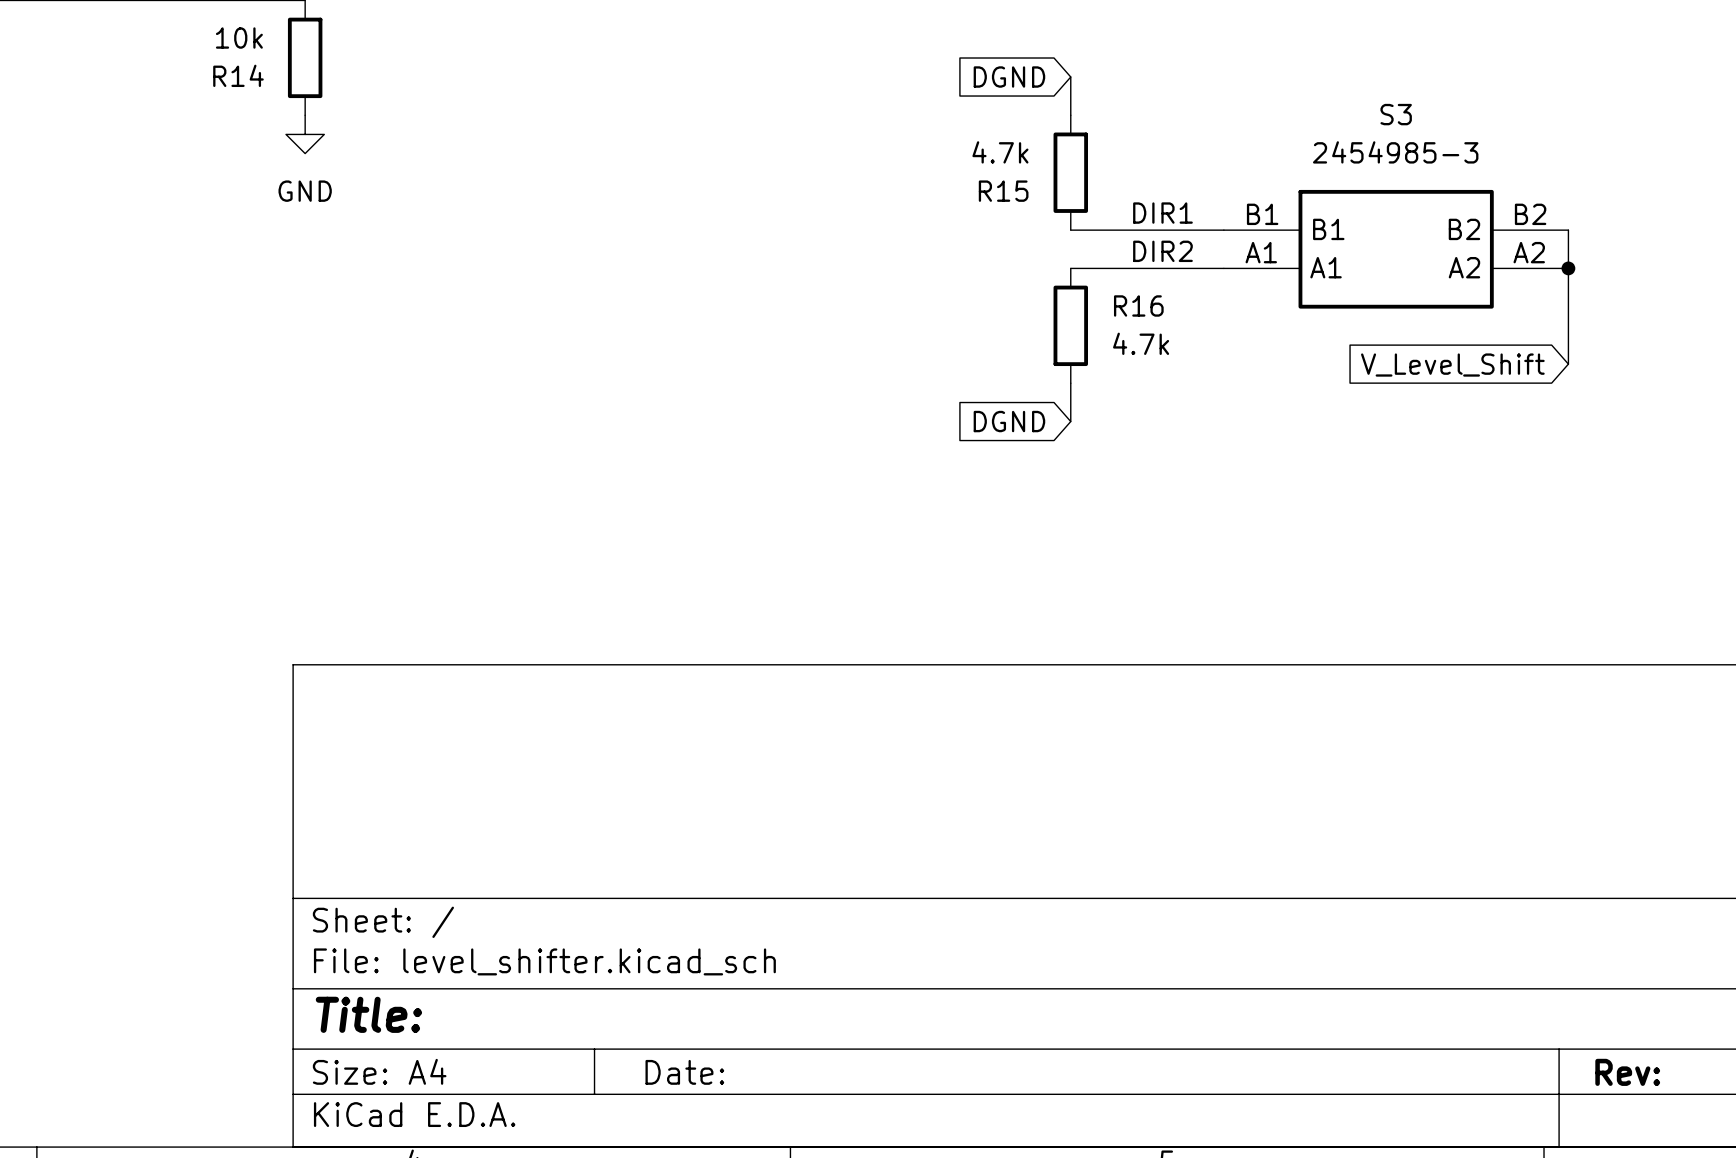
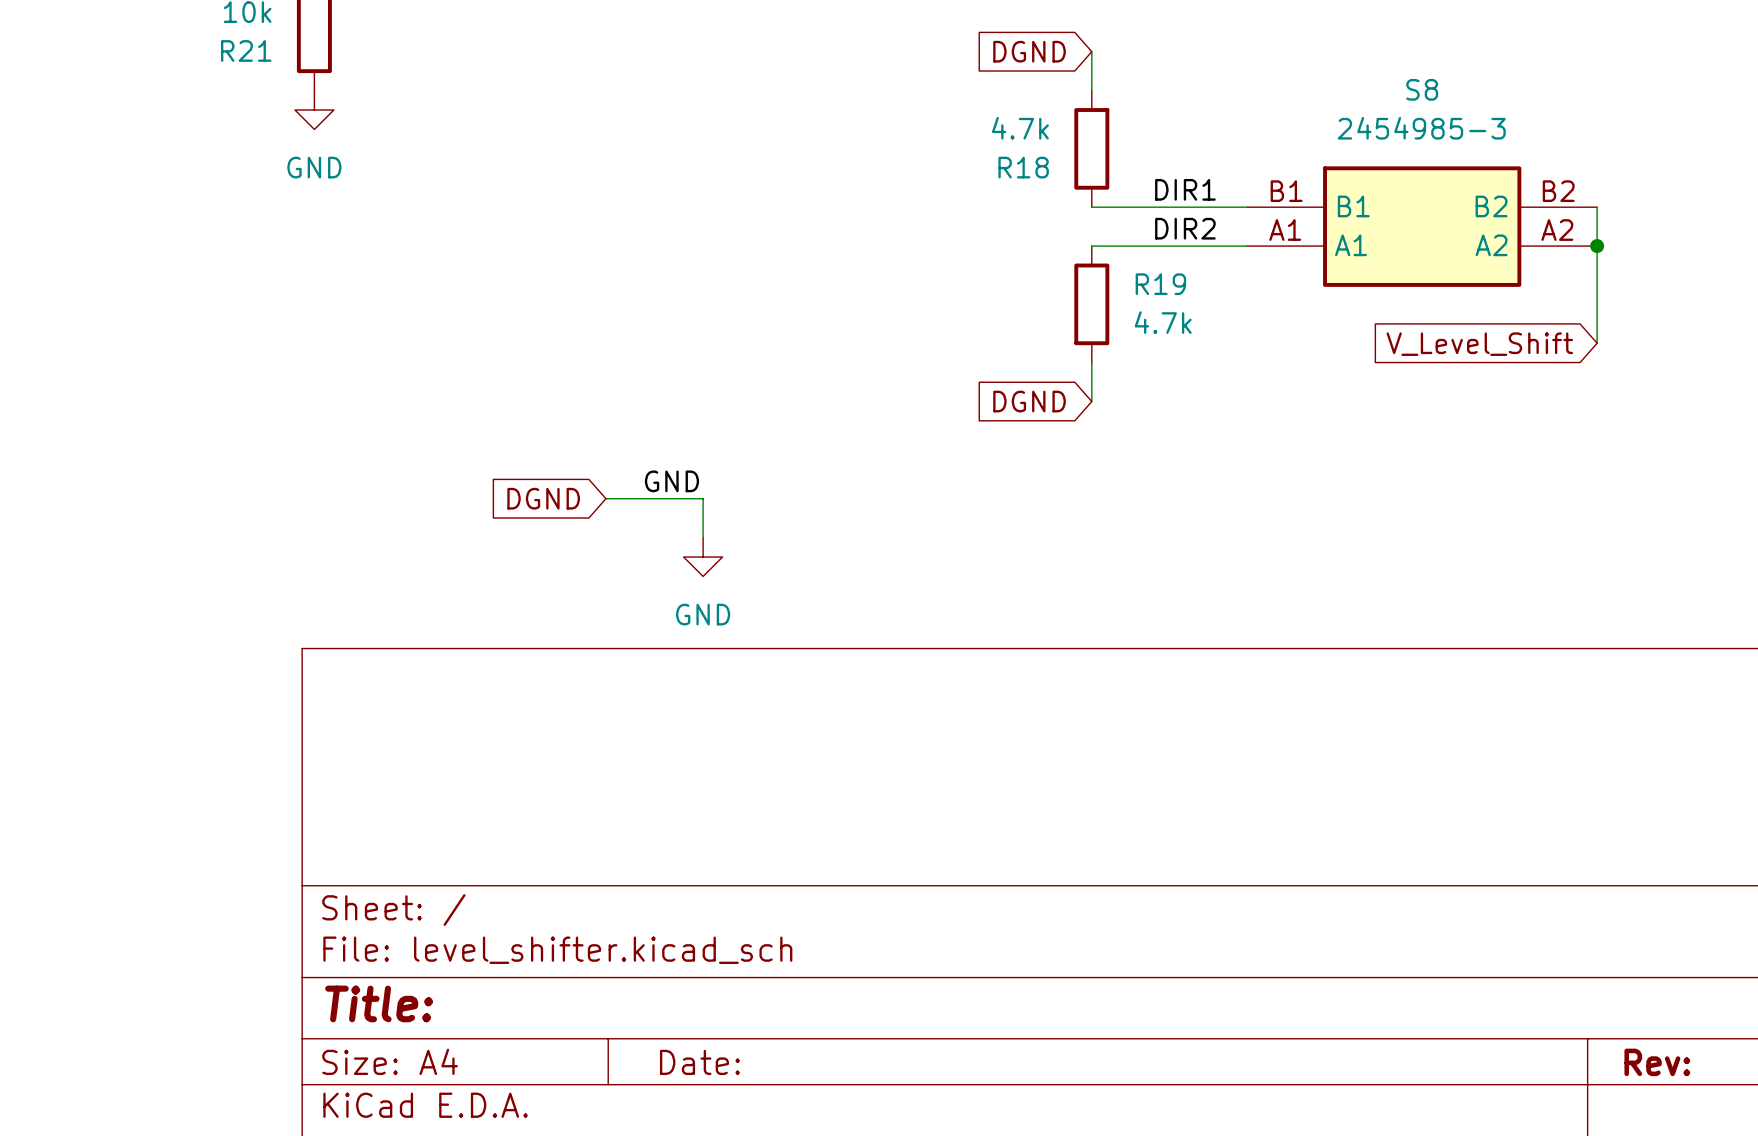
R14 name: R14 (238, 75) -> R21 (246, 50)
S3 name: S3 (1396, 114) -> S8 (1422, 89)
R15 name: R15 (1003, 191) -> R18 (1023, 167)
R16 name: R16 (1138, 305) -> R19 (1160, 284)
label: none -> GND (671, 481)
global label: none -> DGND (543, 498)
wire: none -> (605, 498) (703, 498) (703, 537)
power symbol: none -> GND (703, 557)

